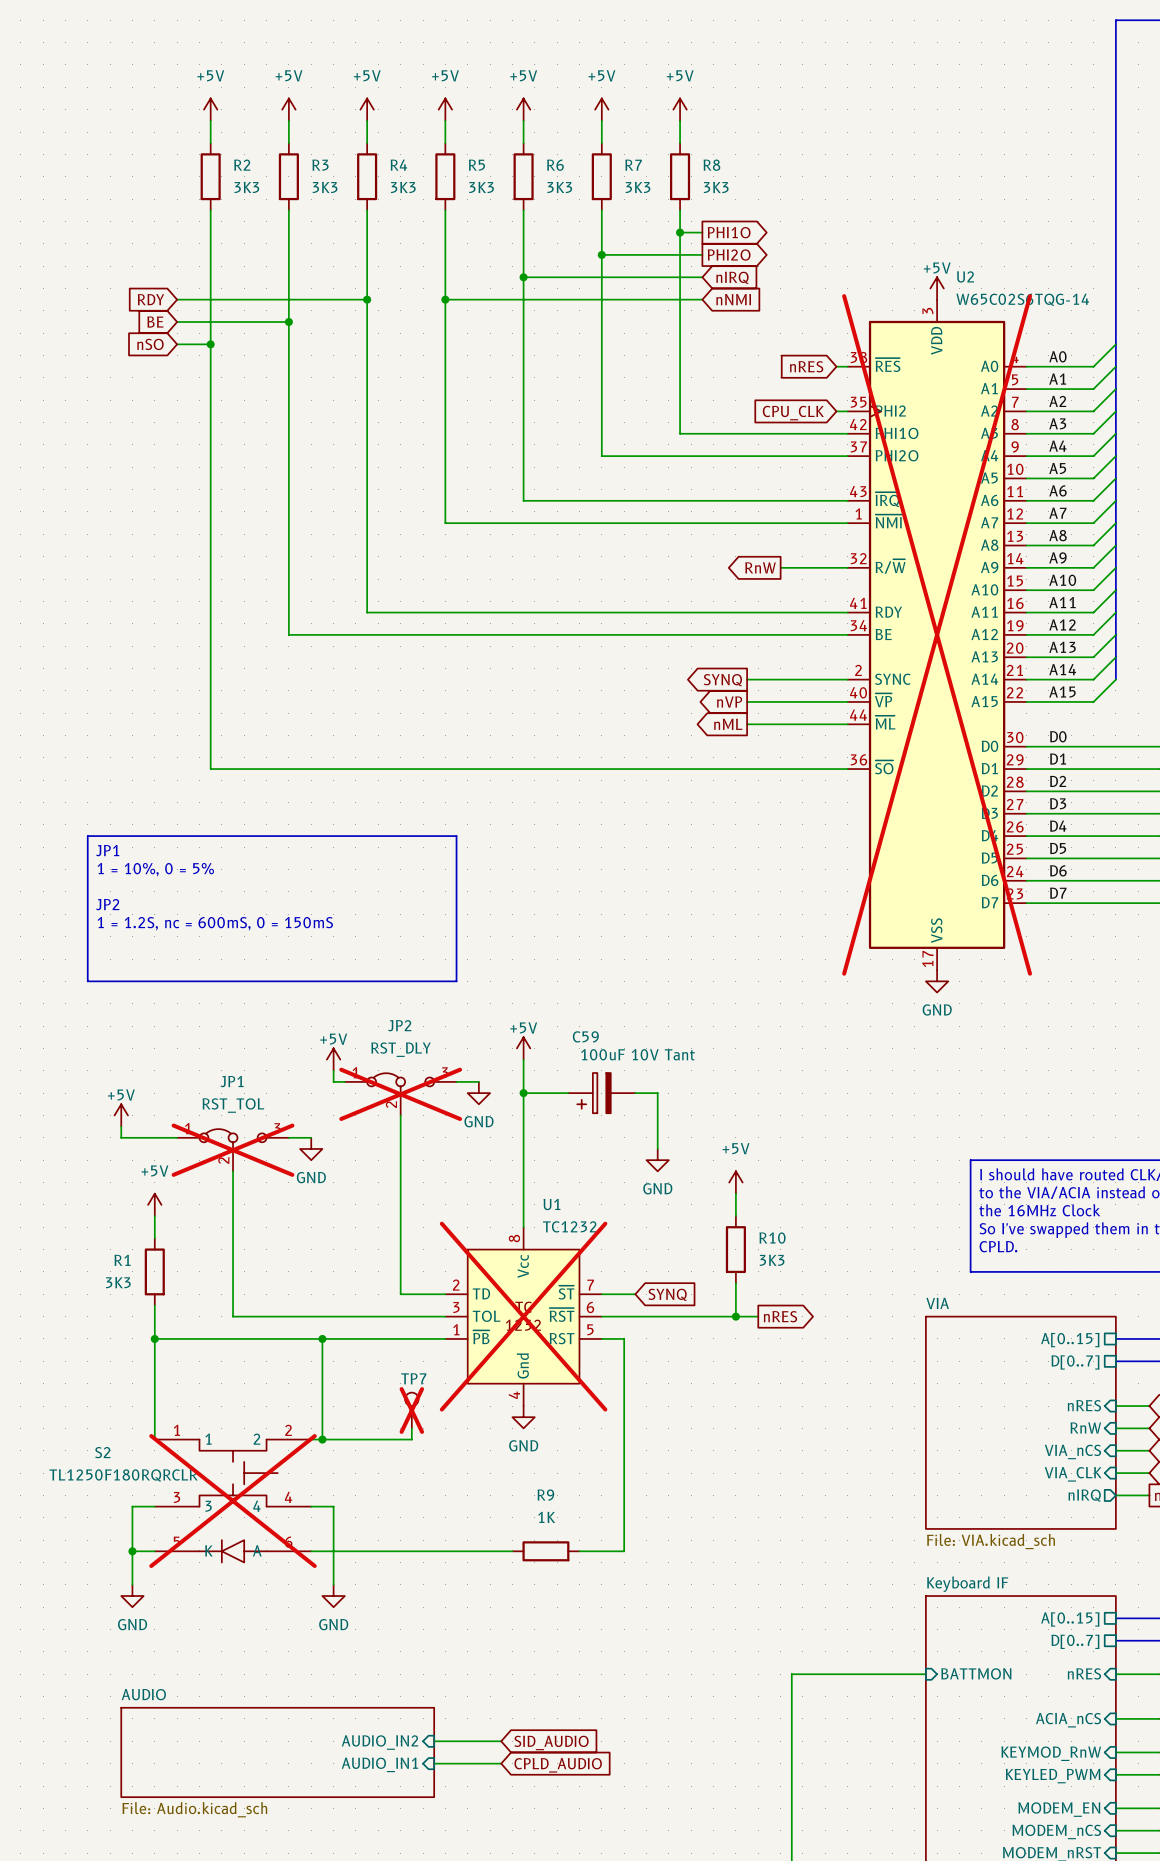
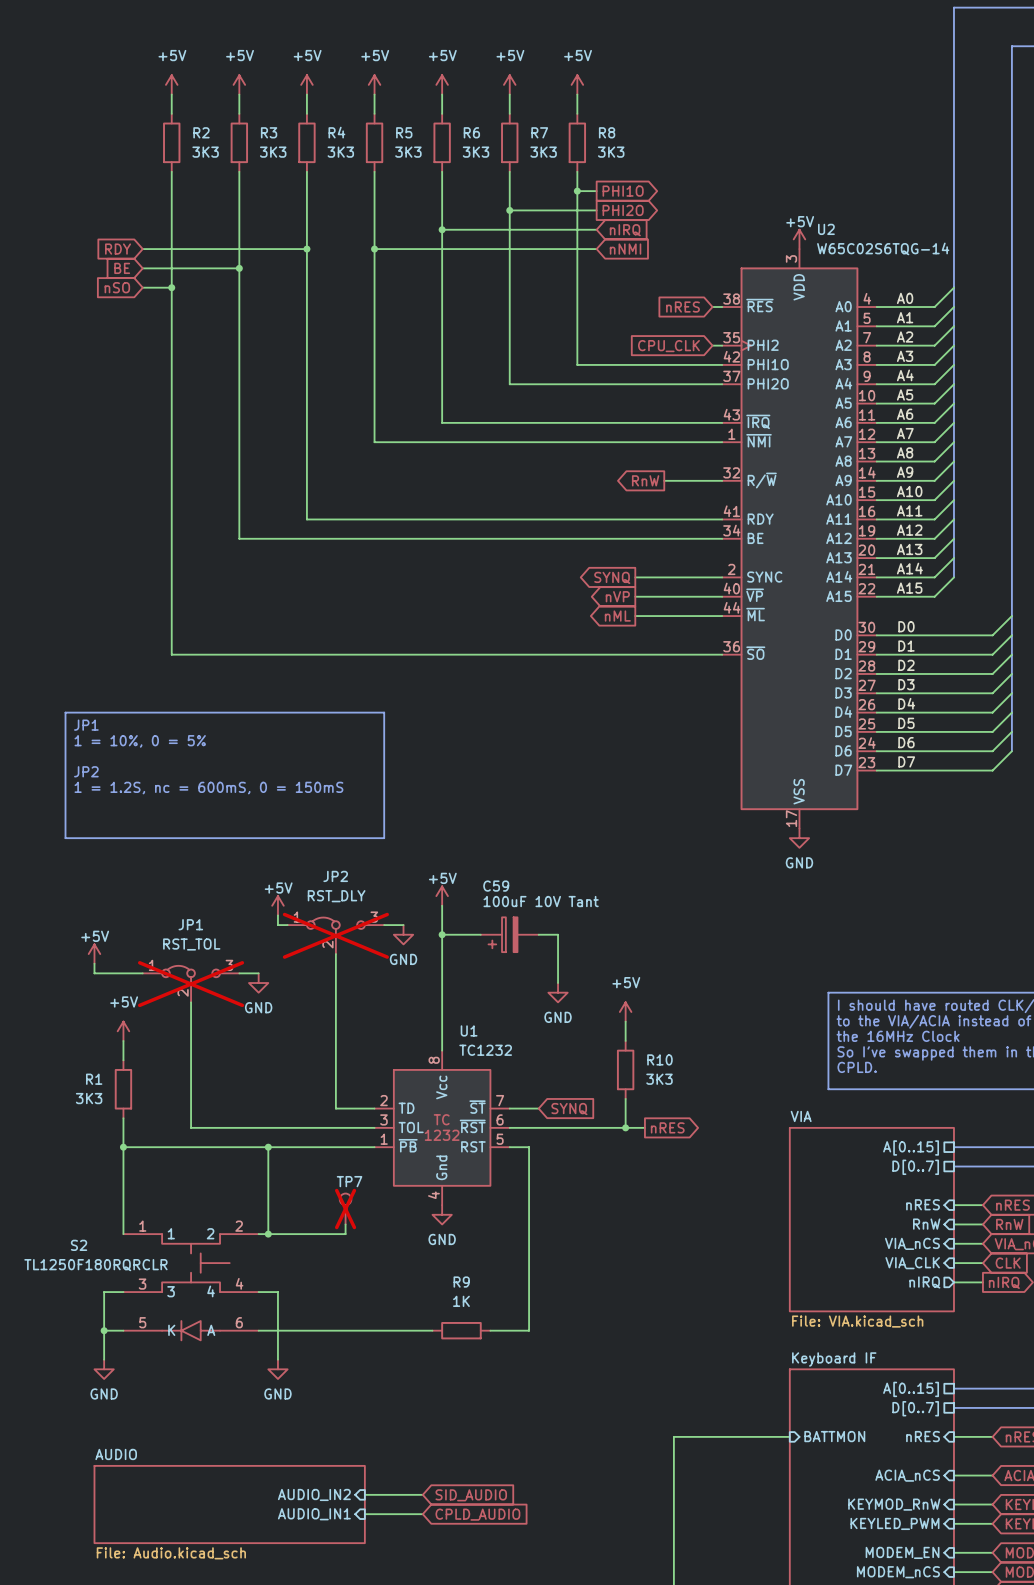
U2 do-not-place cross: (937, 634) -> none
U1 do-not-place cross: (523, 1316) -> none
S2 do-not-place cross: (233, 1501) -> none

